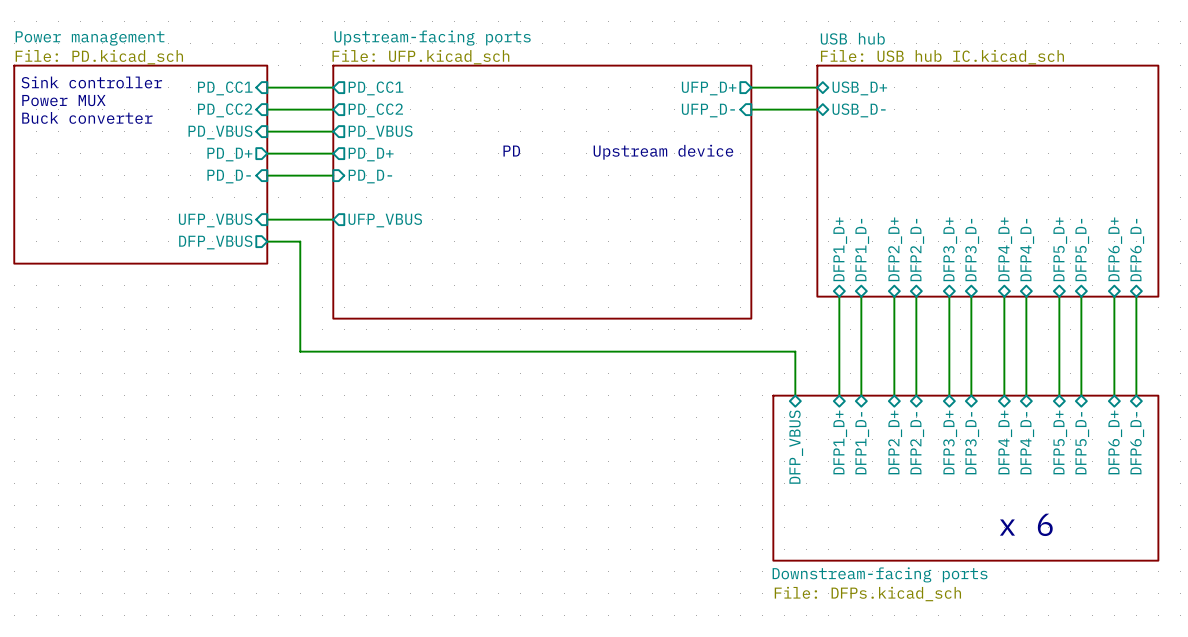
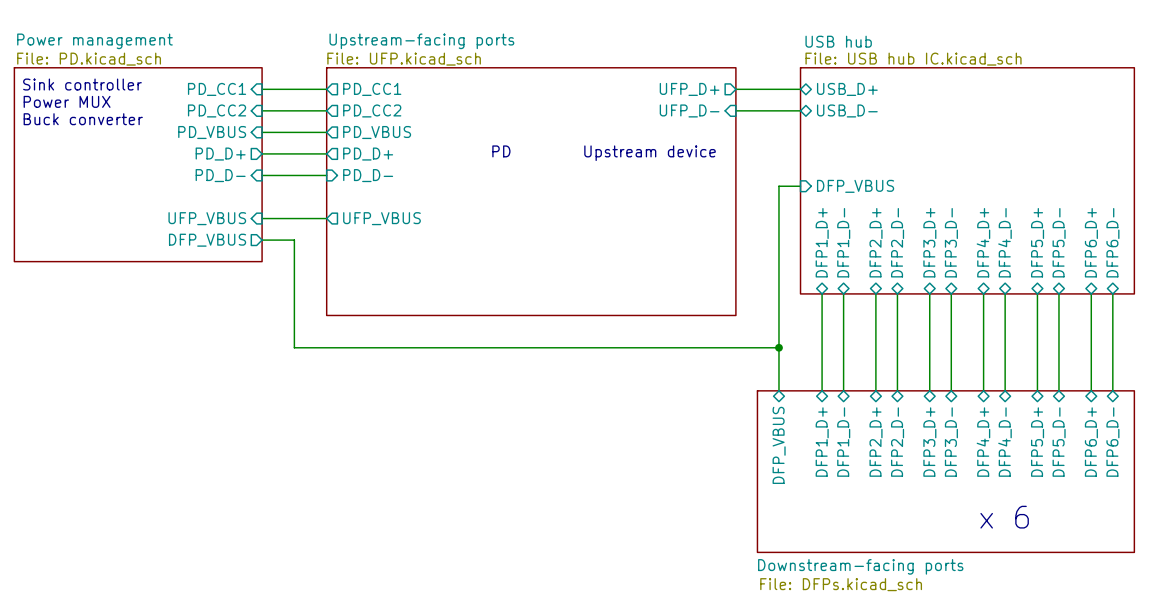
wire: none -> (800, 186) (778, 186) (778, 347)
sheet pin: none -> DFP_VBUS (855, 186)
junction: none -> (778, 347)

